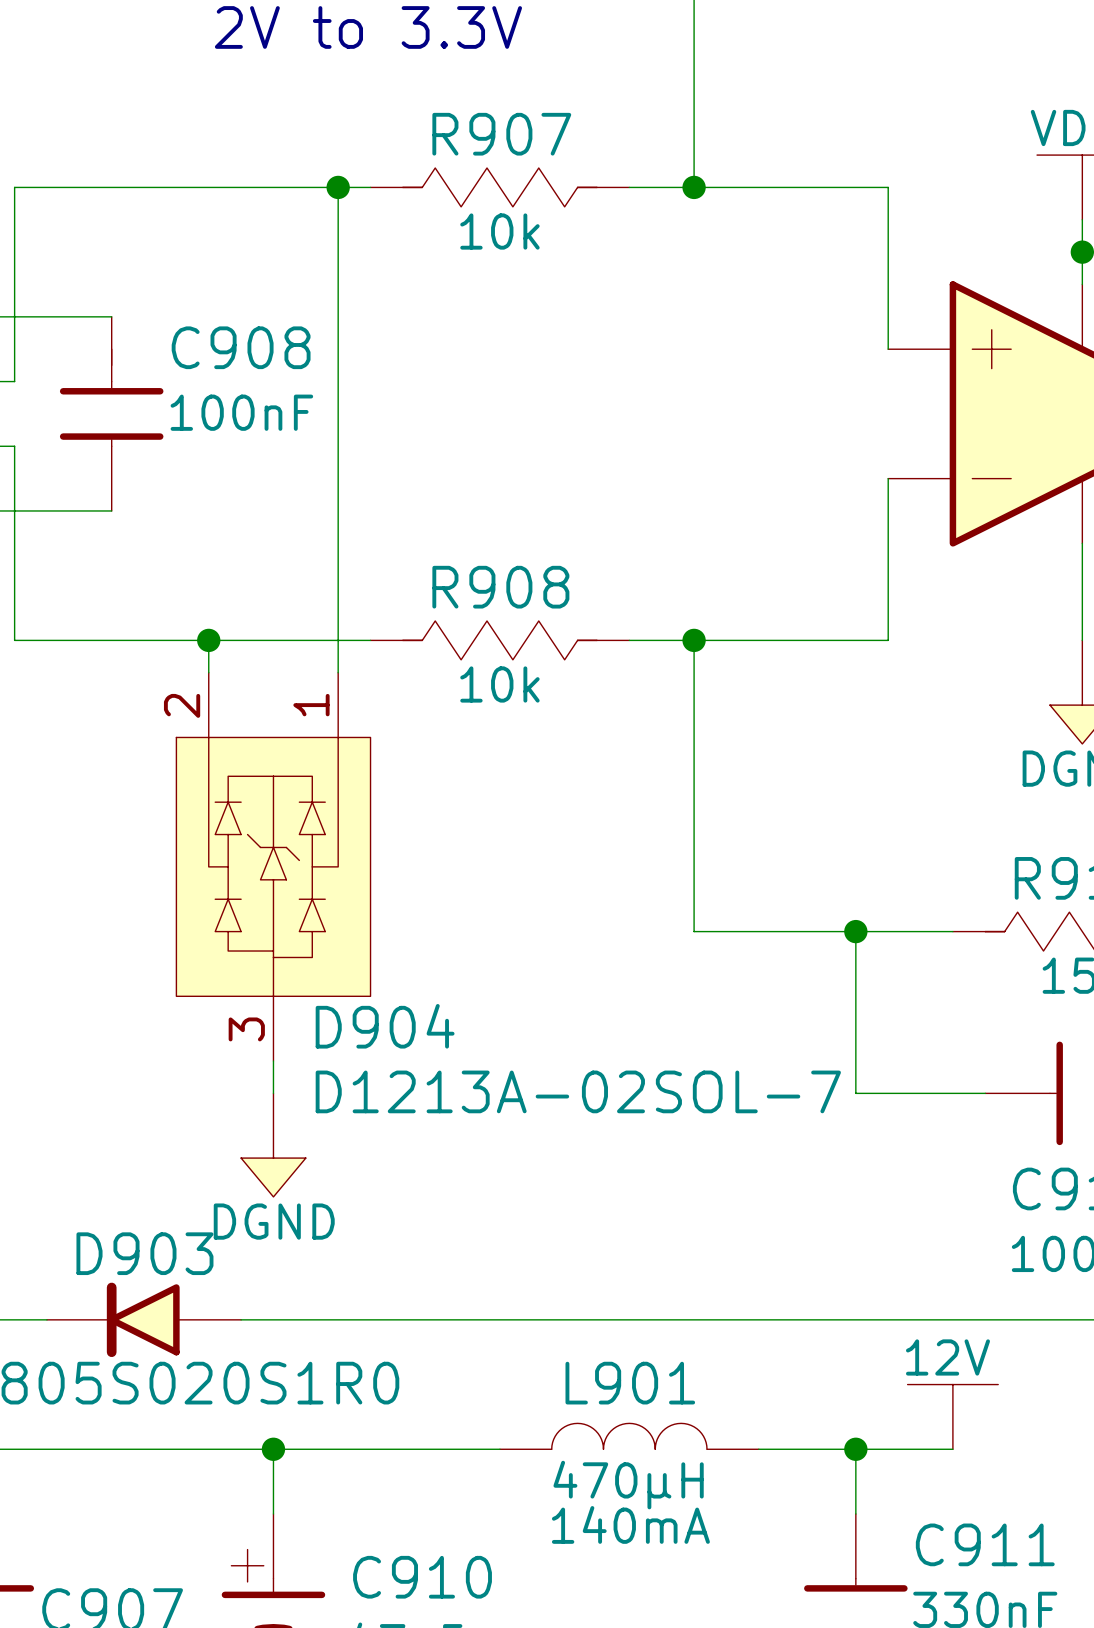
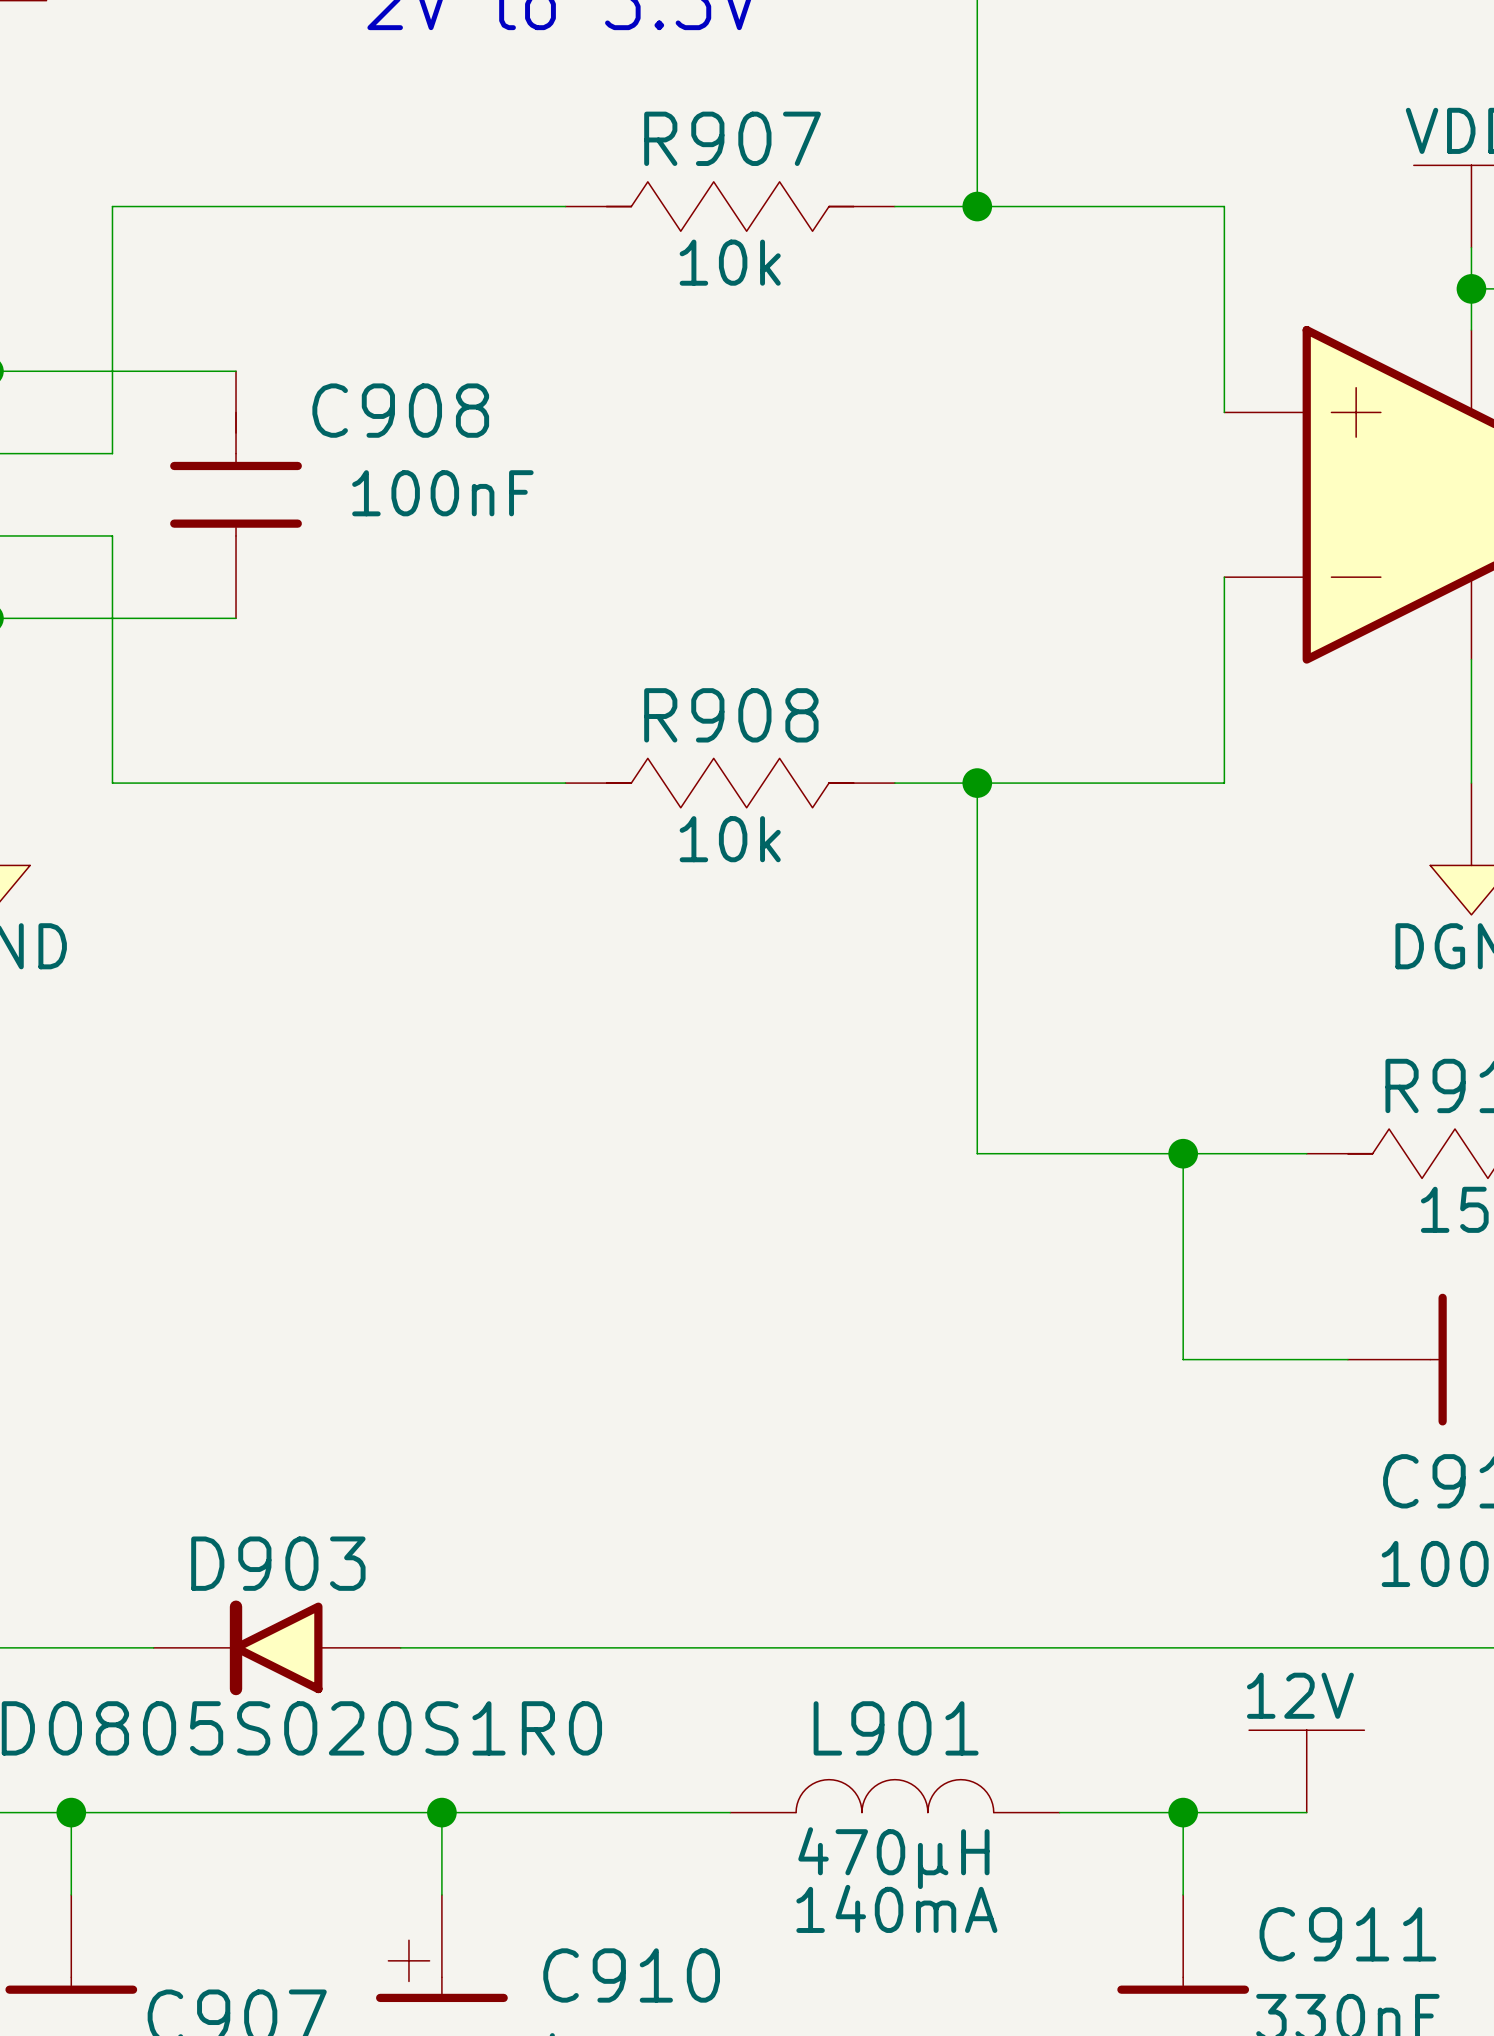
wire: (338, 187) (338, 672) -> none
junction: (338, 187) -> none
C908 text position: 100nF (241, 412) -> 100nF (442, 493)
wire: (208, 640) (208, 672) -> none
junction: (208, 640) -> none
D904: D1213A-02SOL-7 (273, 866) -> none
wire: (273, 1061) (273, 1093) -> none
power symbol: DGND (273, 1145) -> none

